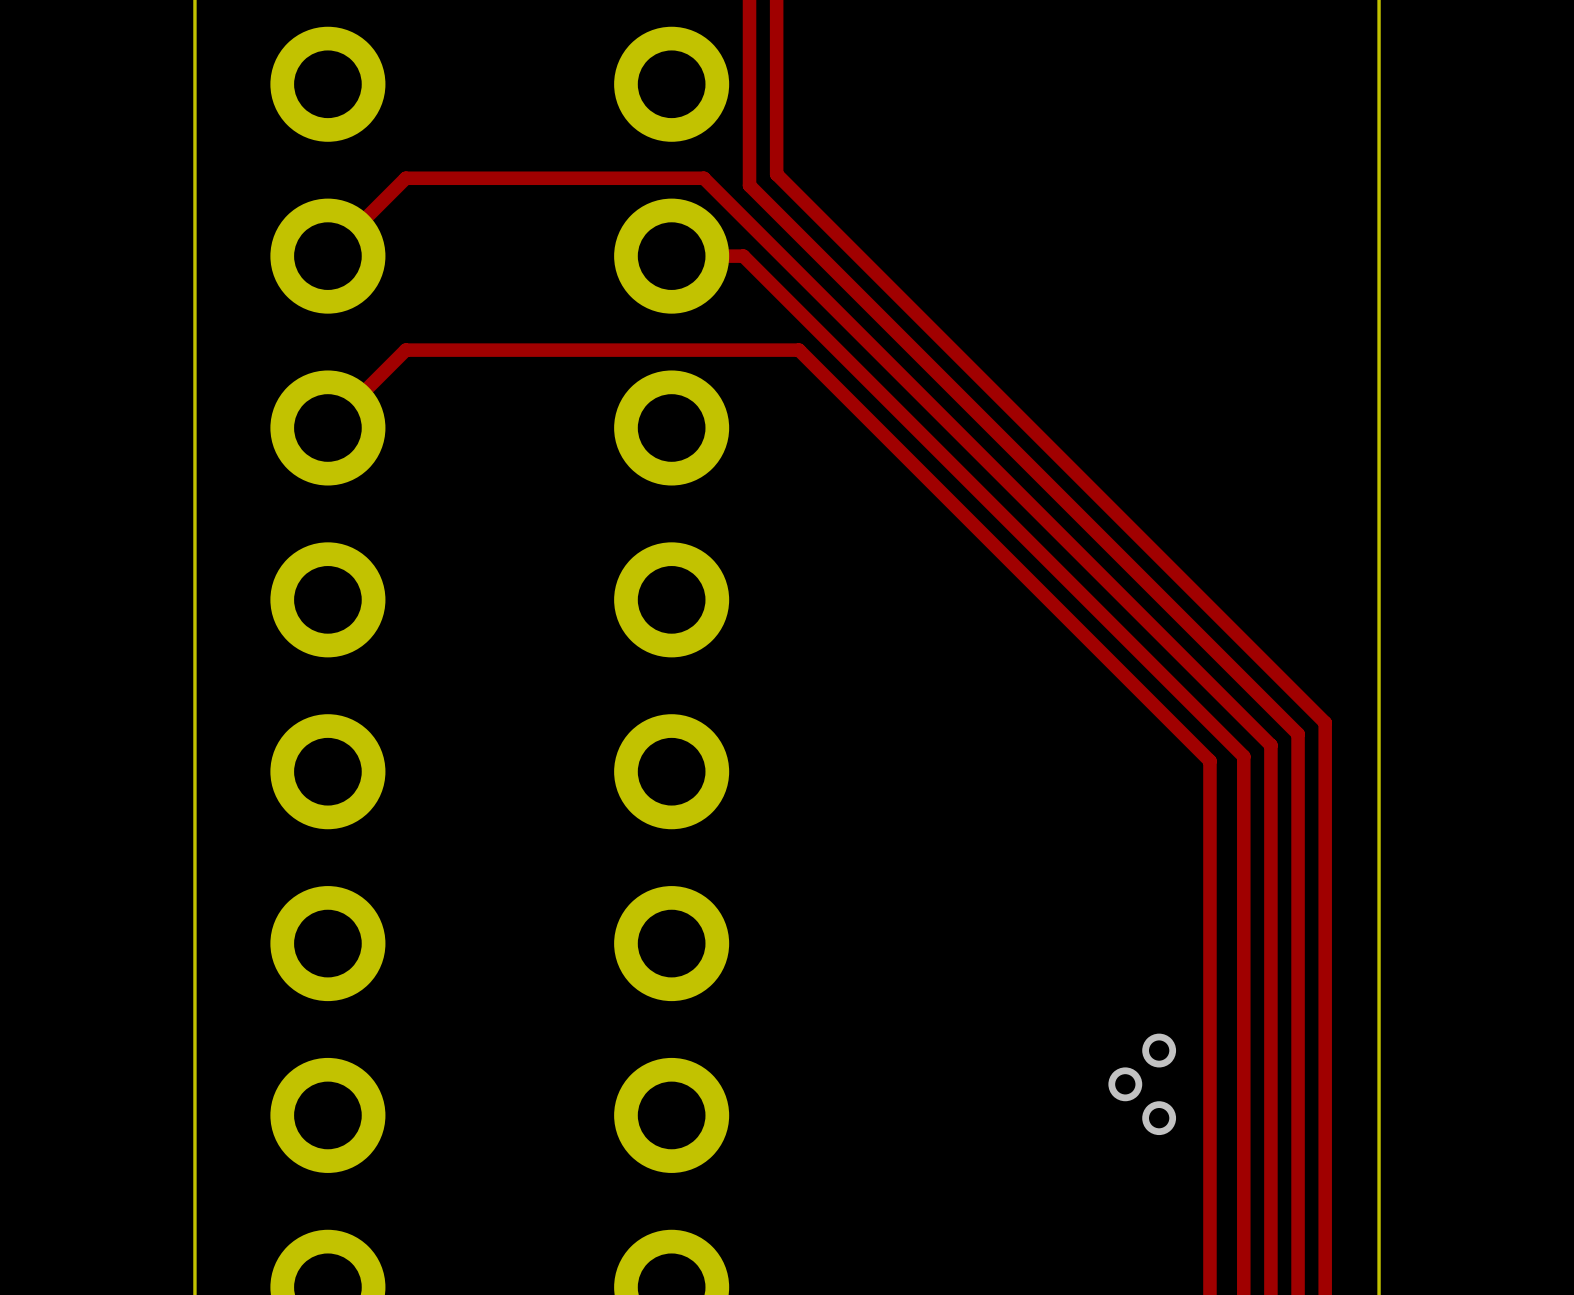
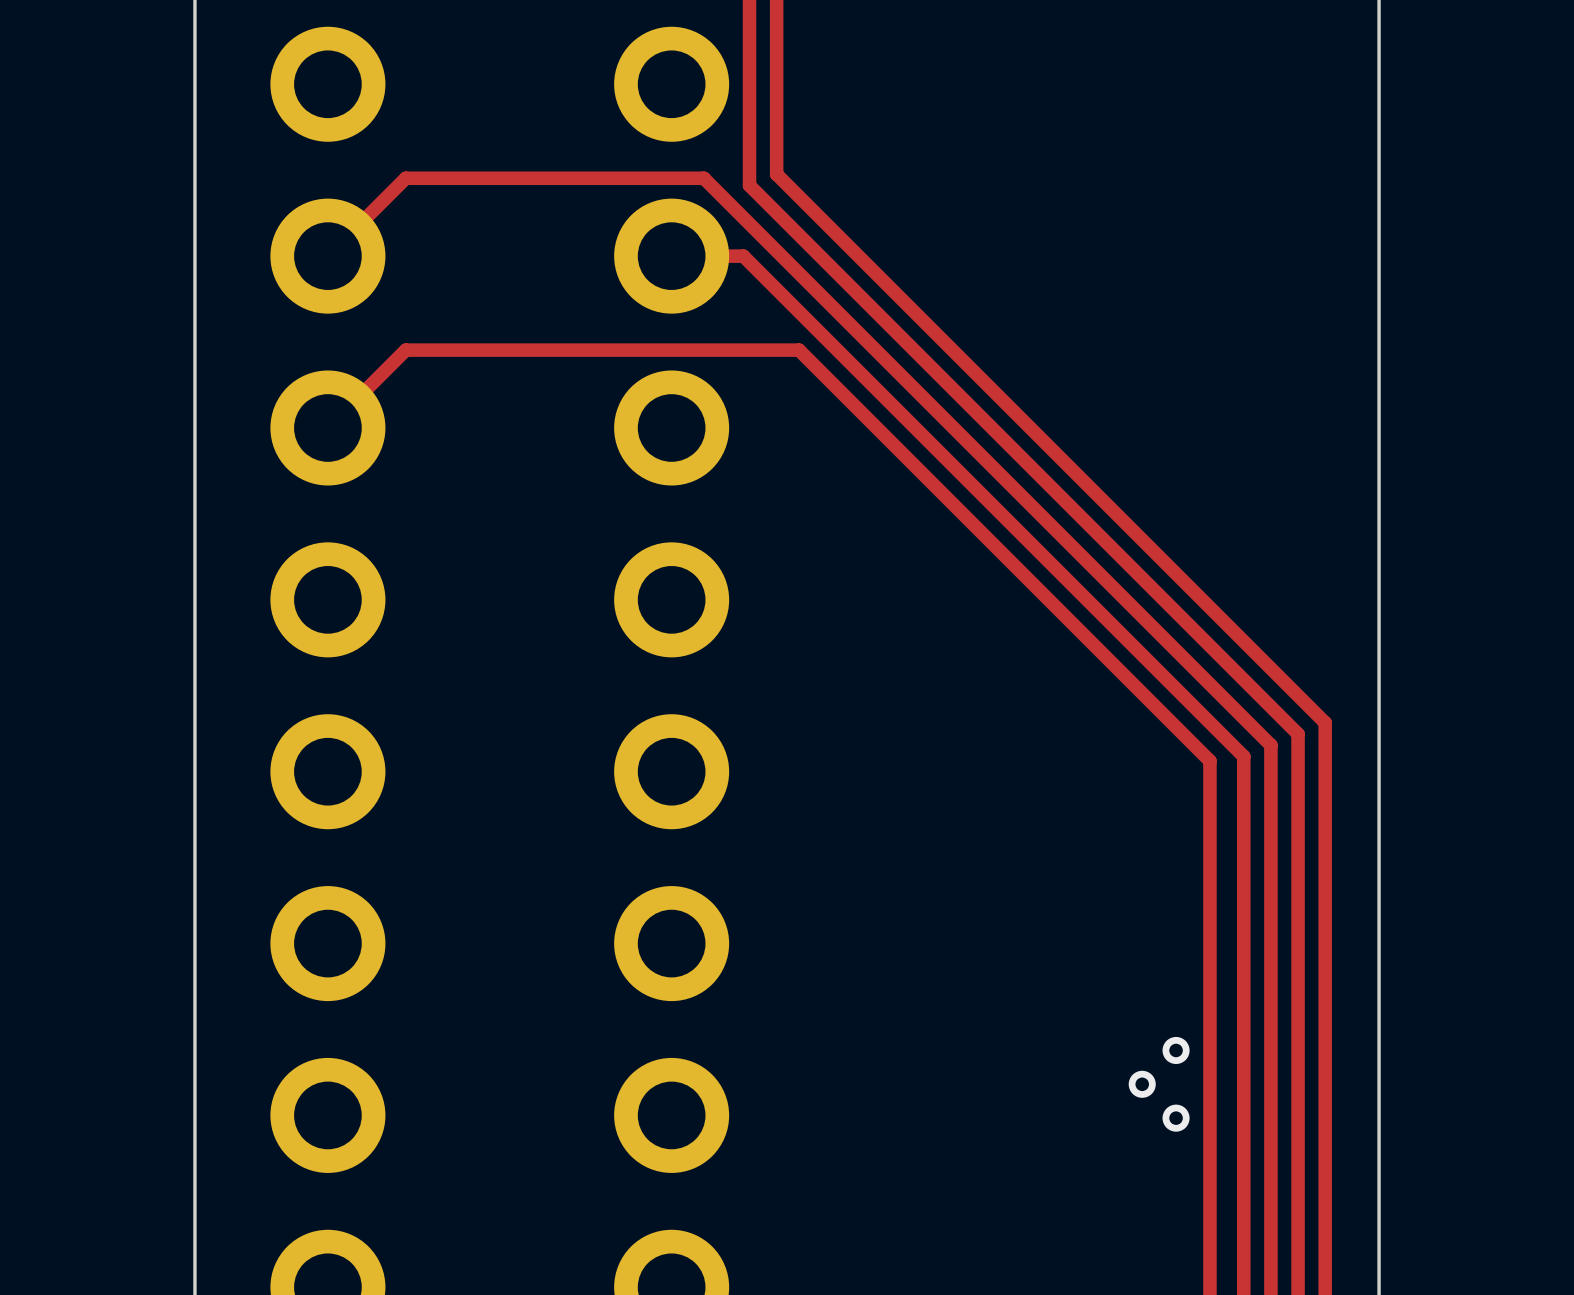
via position: (1159, 1050) -> (1176, 1050)
via position: (1125, 1084) -> (1142, 1084)
via position: (1159, 1118) -> (1176, 1118)

